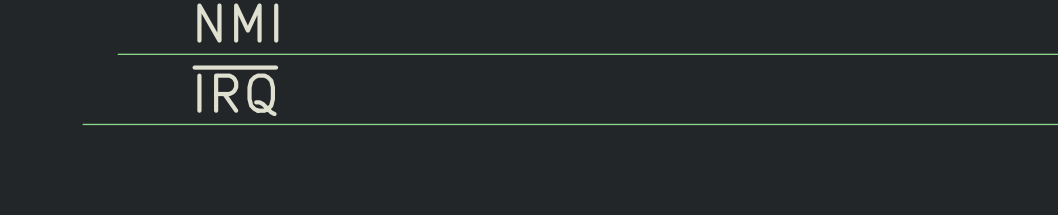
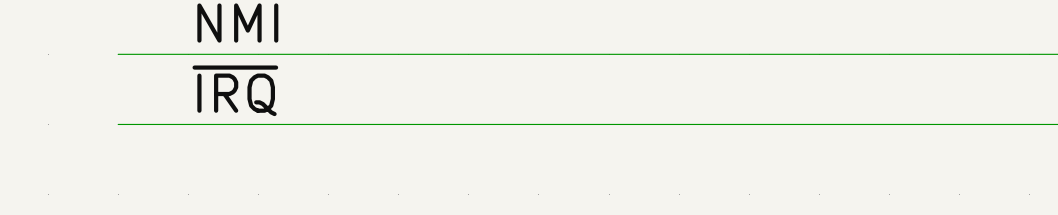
wire: (83, 124) (118, 124) -> none

